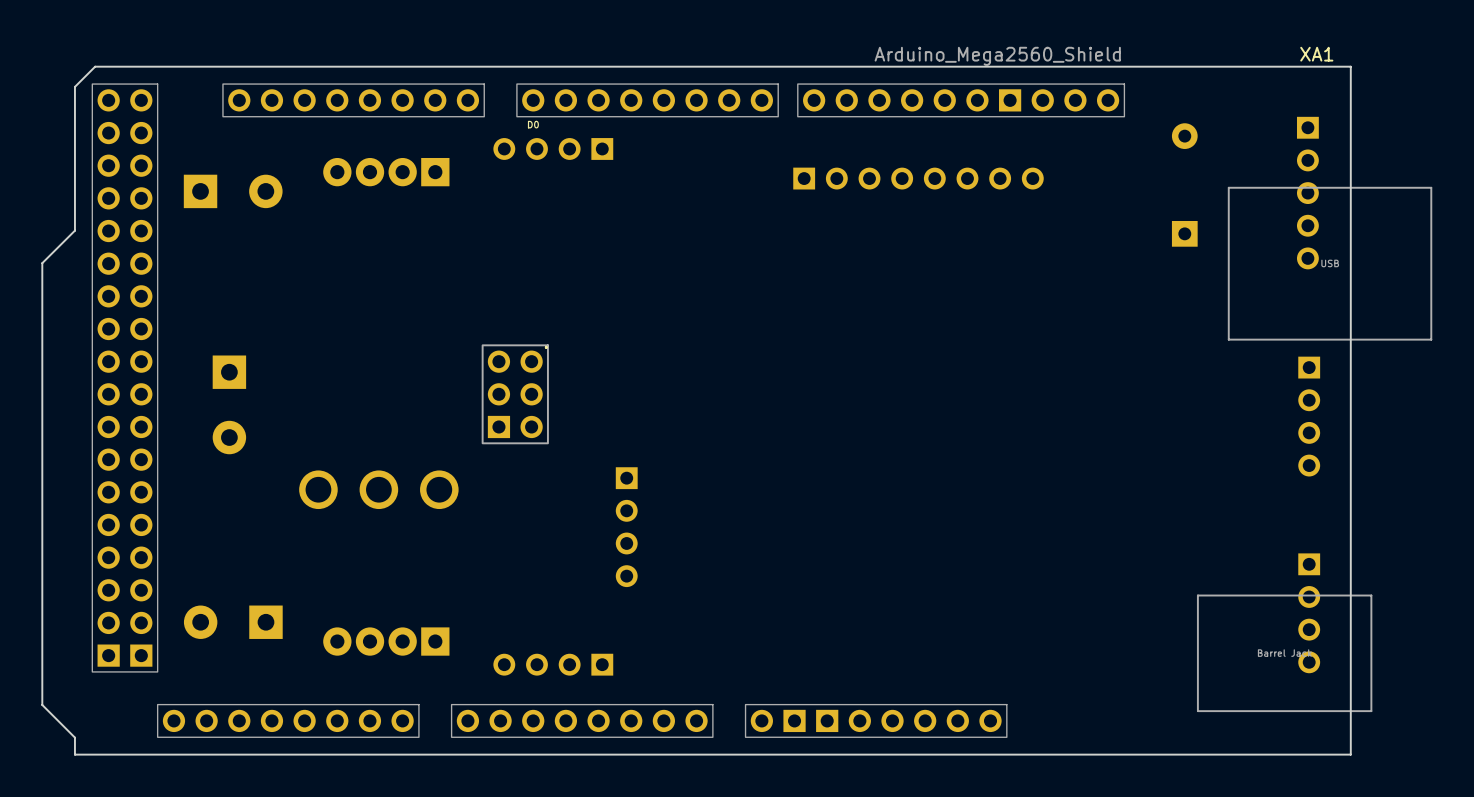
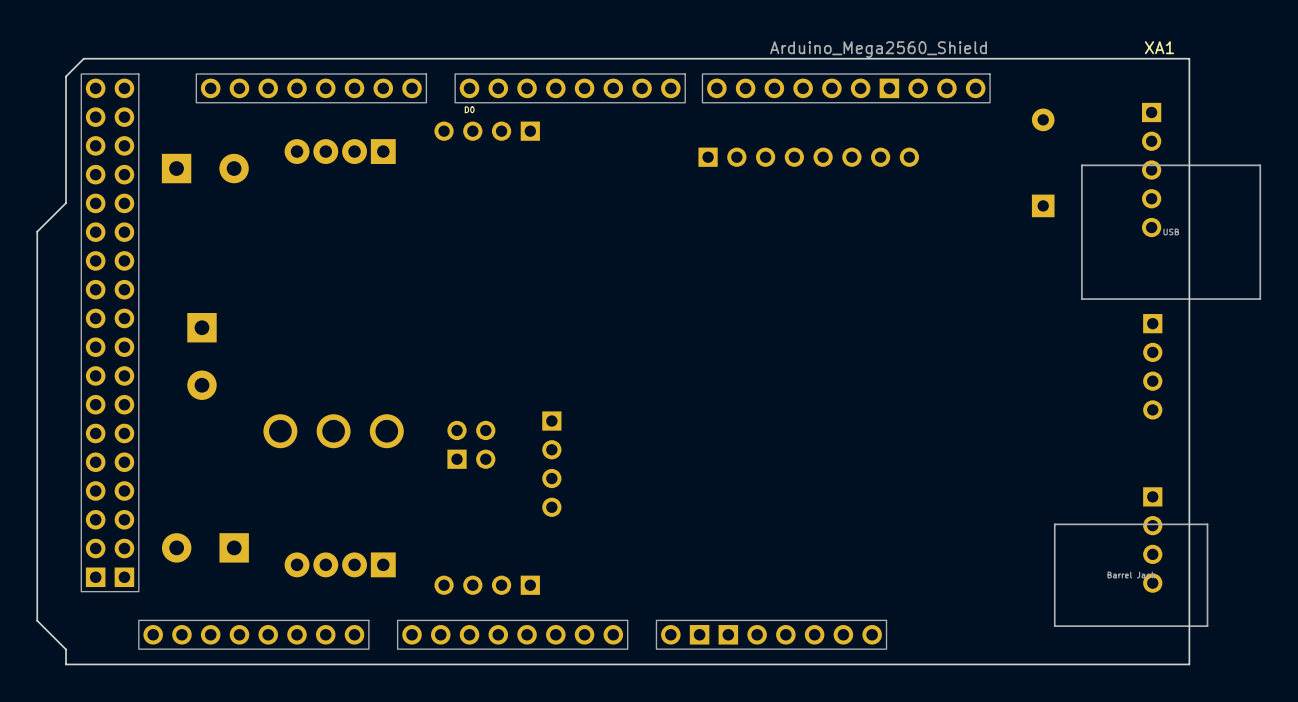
XA1 footprint: [91, 83, 1433, 738] -> [80, 73, 1262, 650]
part: none -> (471, 444)

